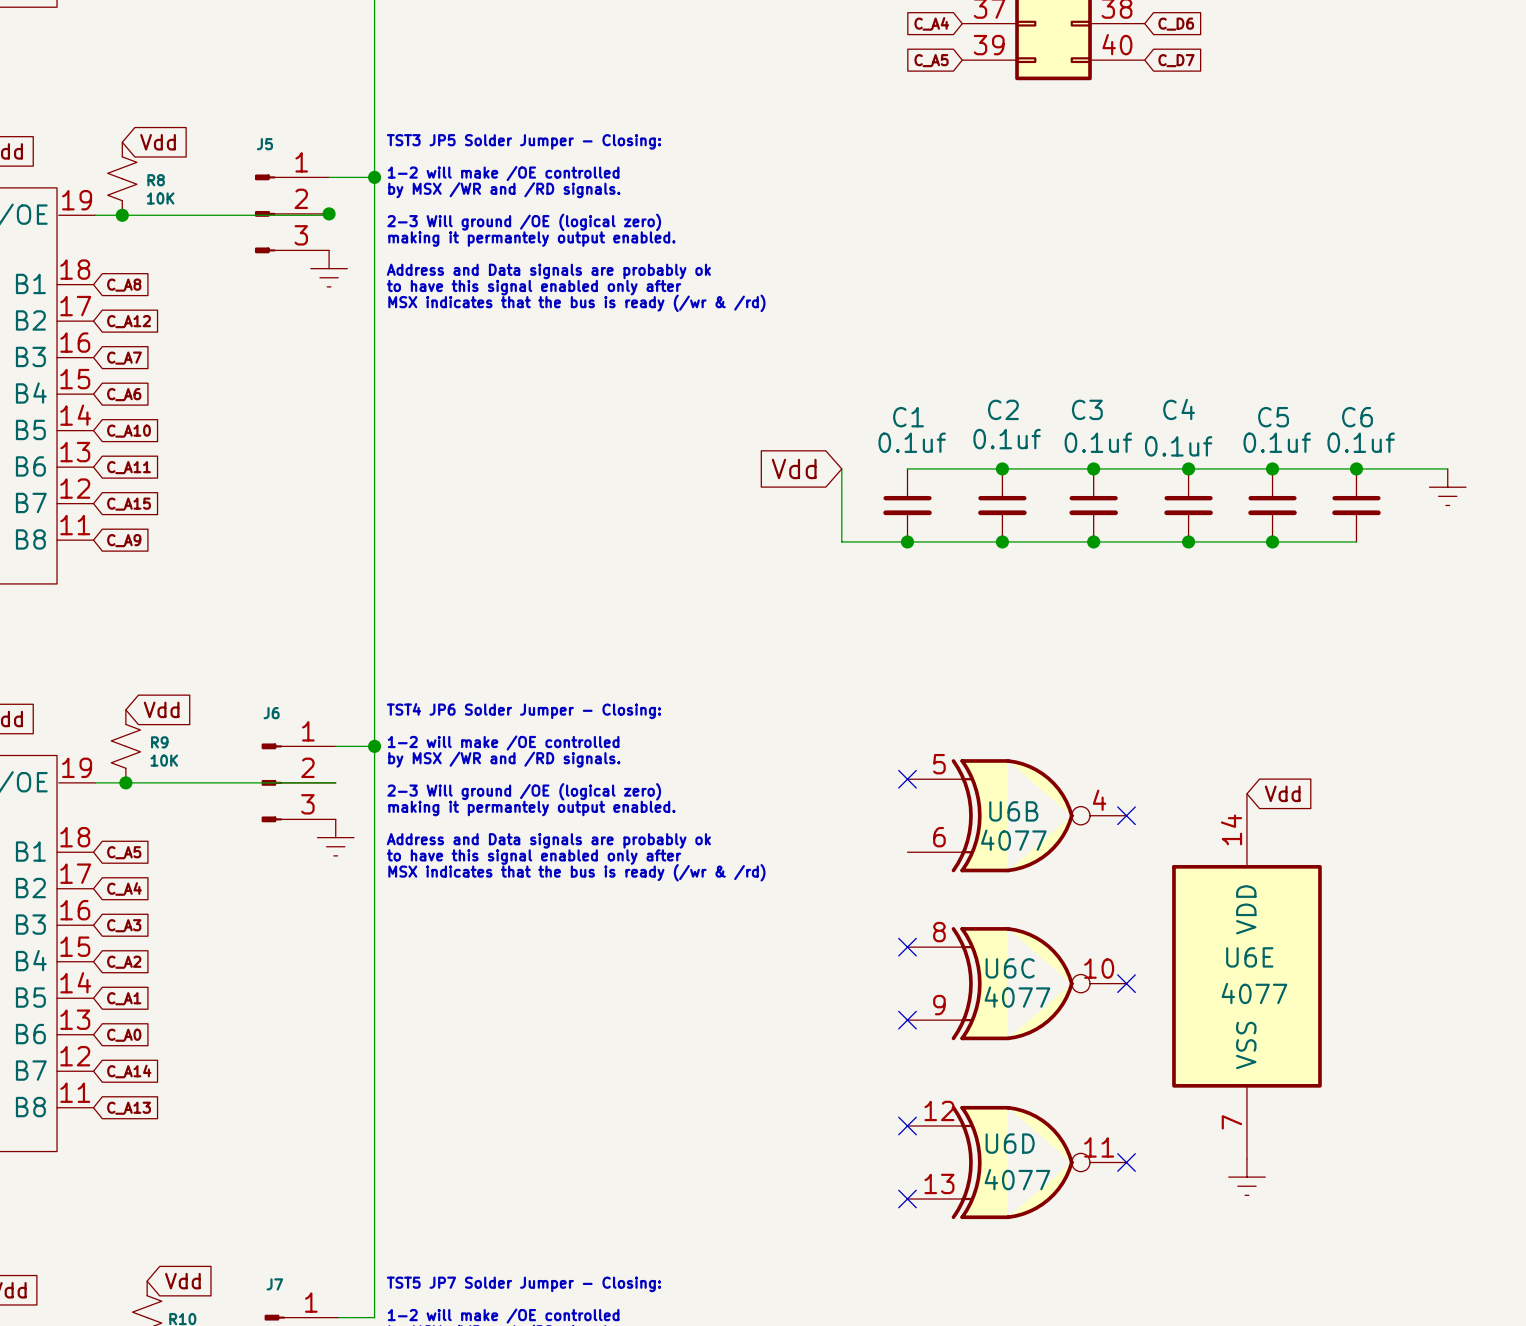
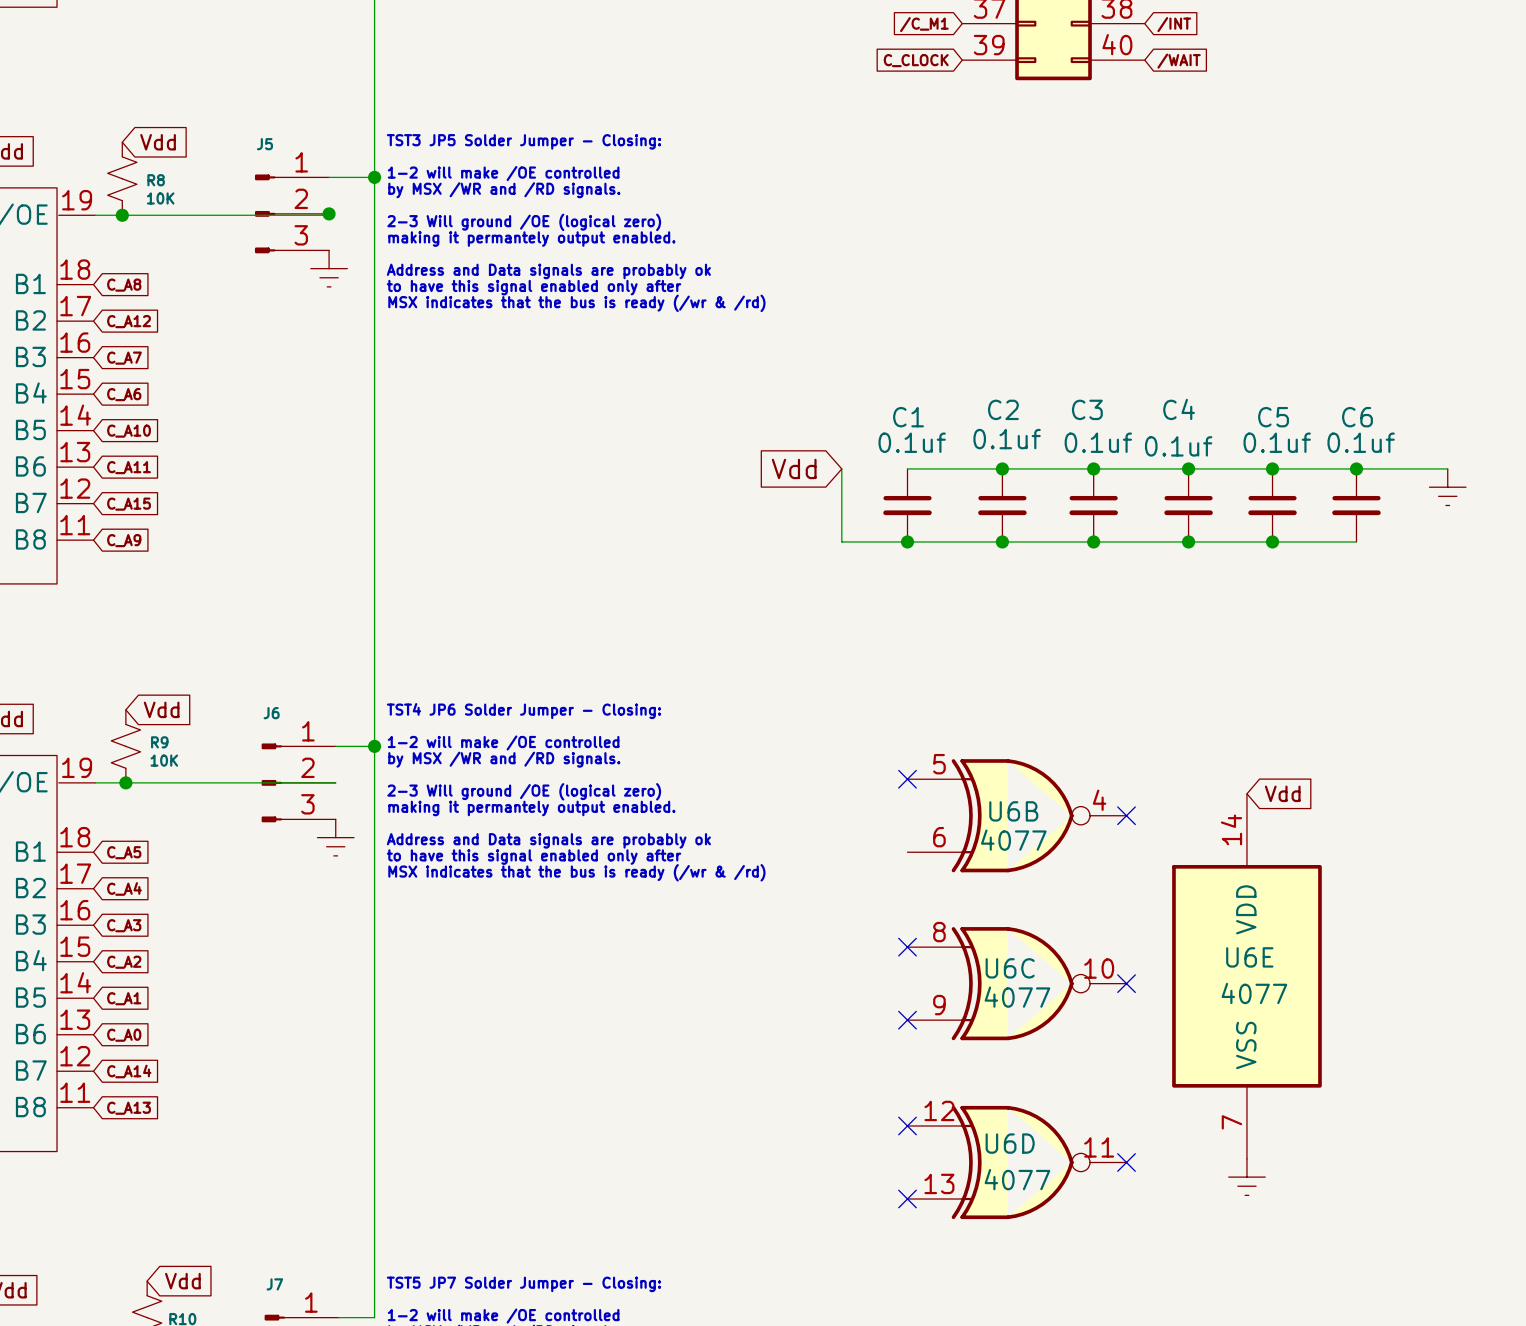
global label: C_A4 (931, 23) -> /C_M1 (924, 24)
global label: C_D6 (1176, 24) -> /INT (1174, 24)
global label: C_A5 (931, 60) -> C_CLOCK (916, 60)
global label: C_D7 (1176, 60) -> /WAIT (1179, 61)

